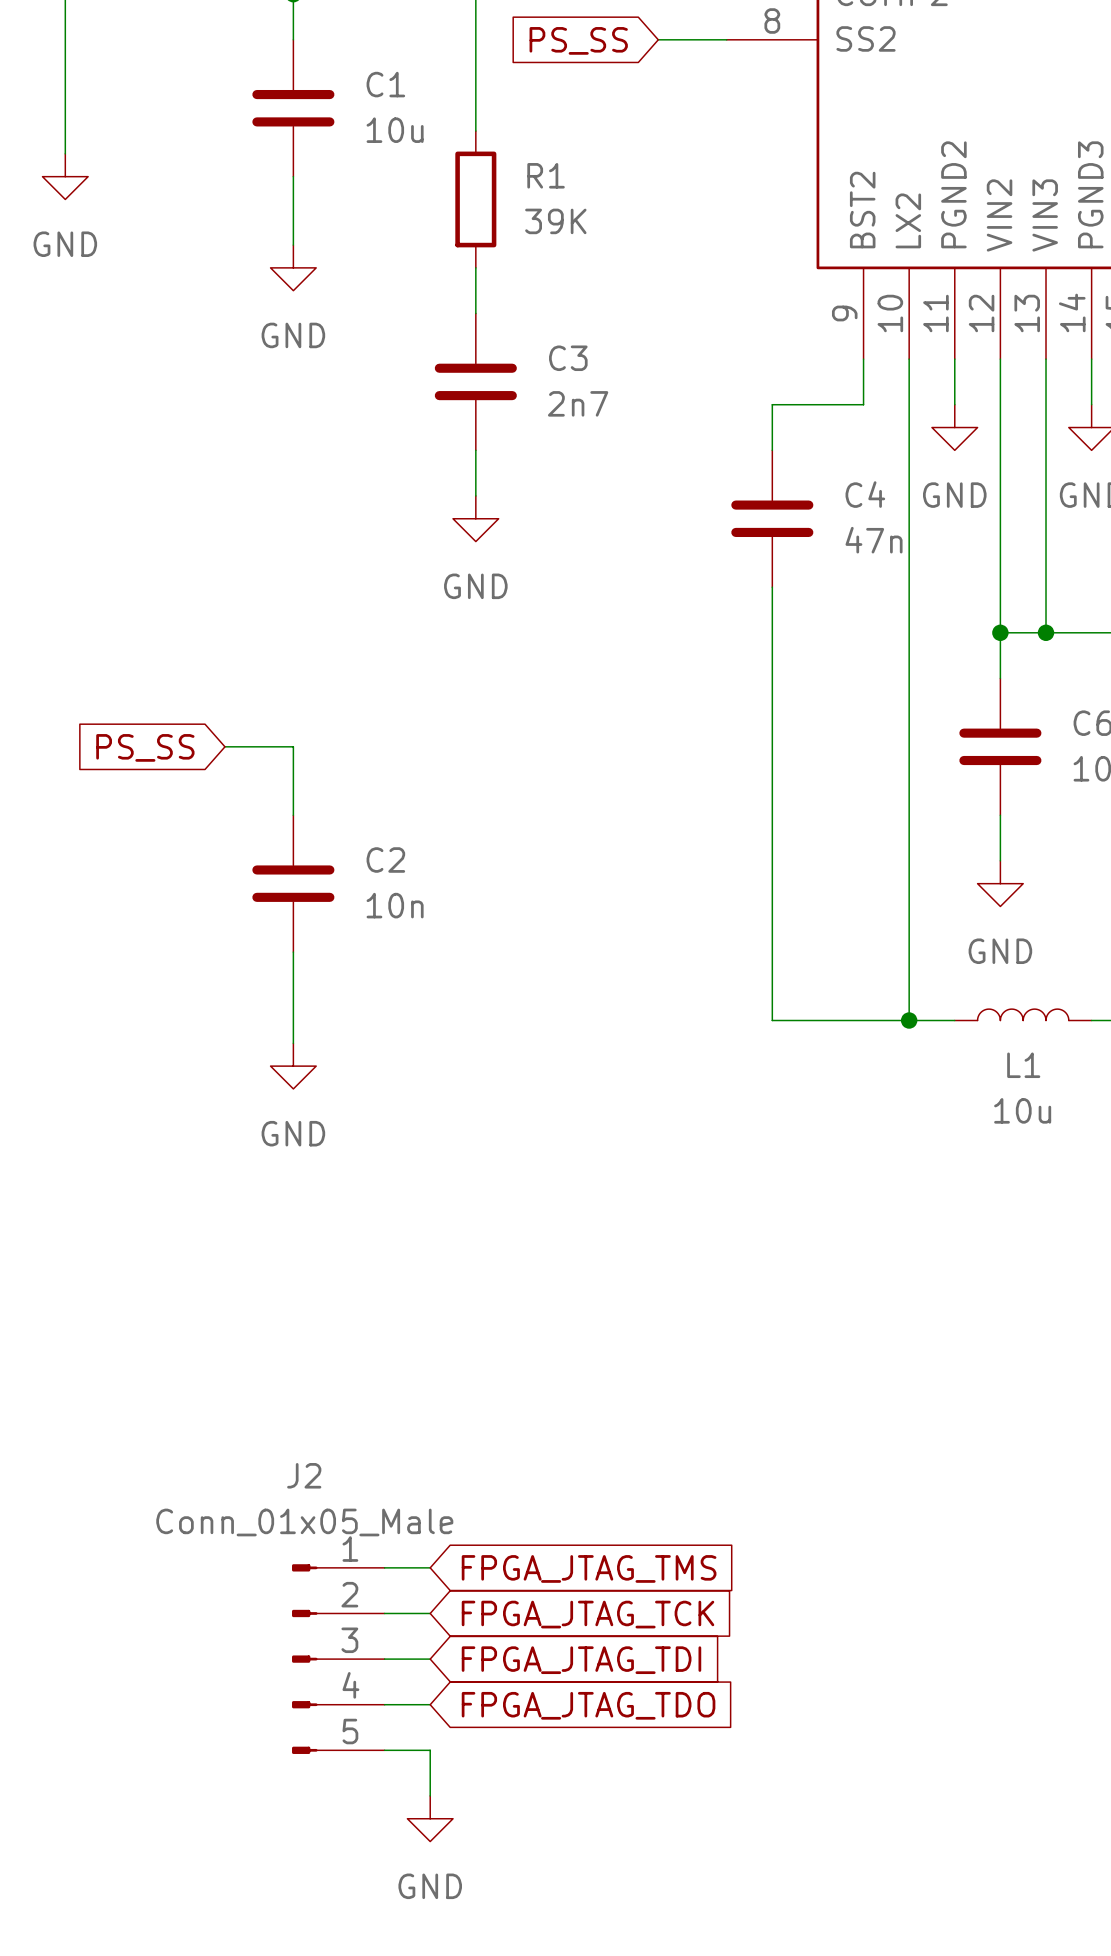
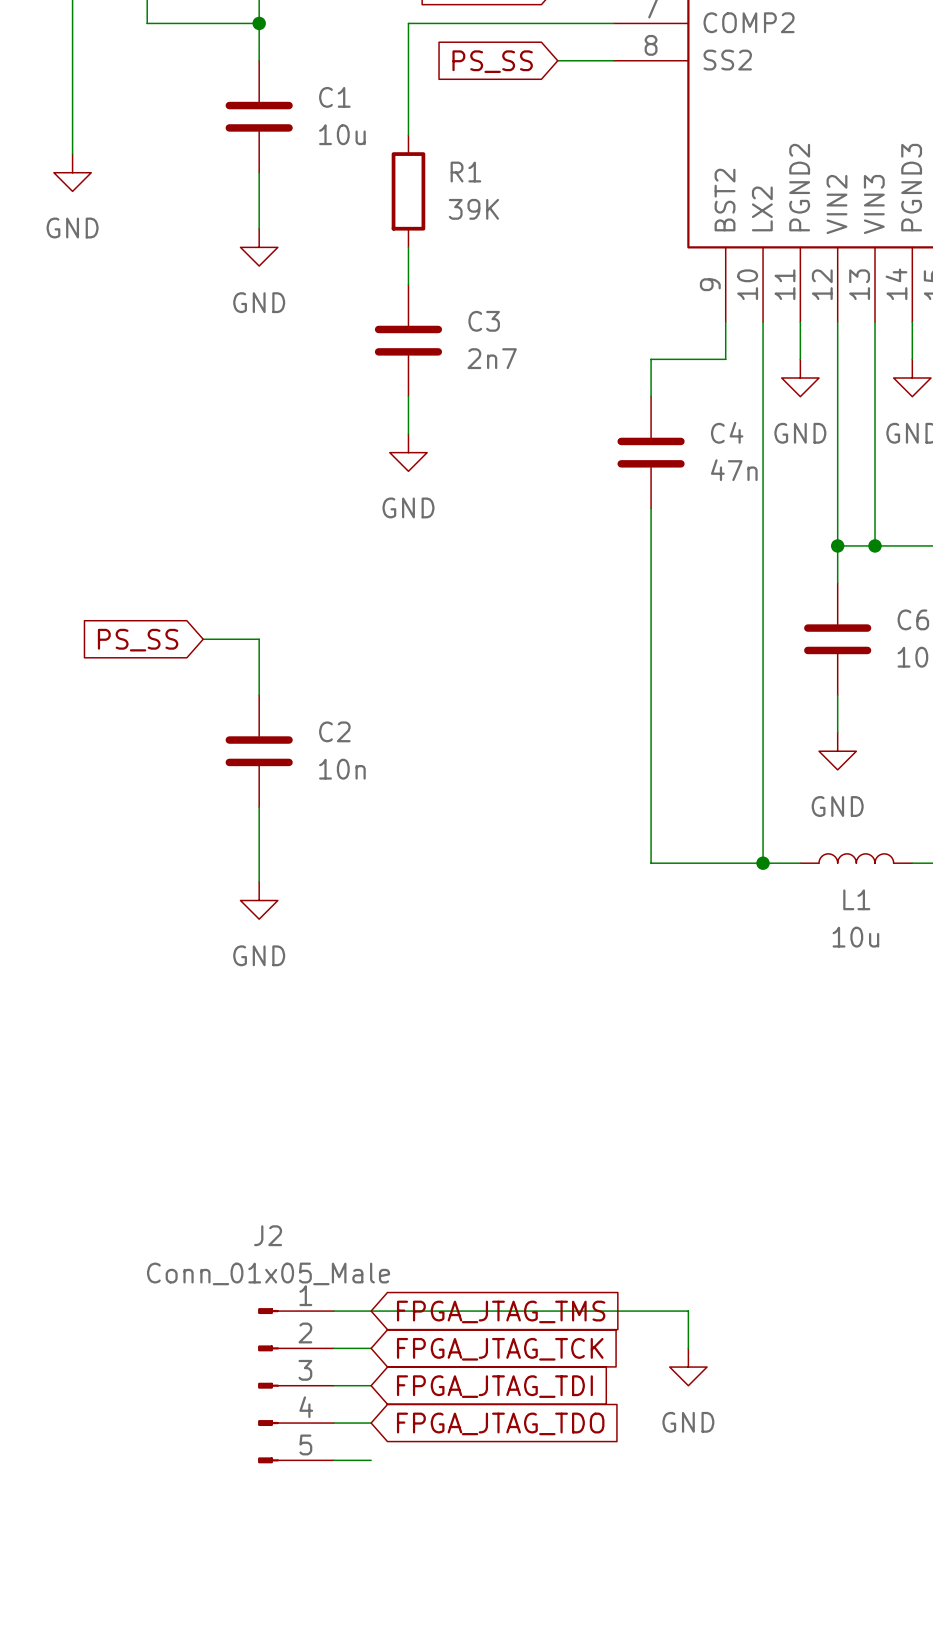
wire: none -> (371, 1311) (688, 1311) (688, 1348)
wire: (430, 1750) (430, 1795) -> none
power symbol position: GND (430, 1818) -> GND (688, 1367)

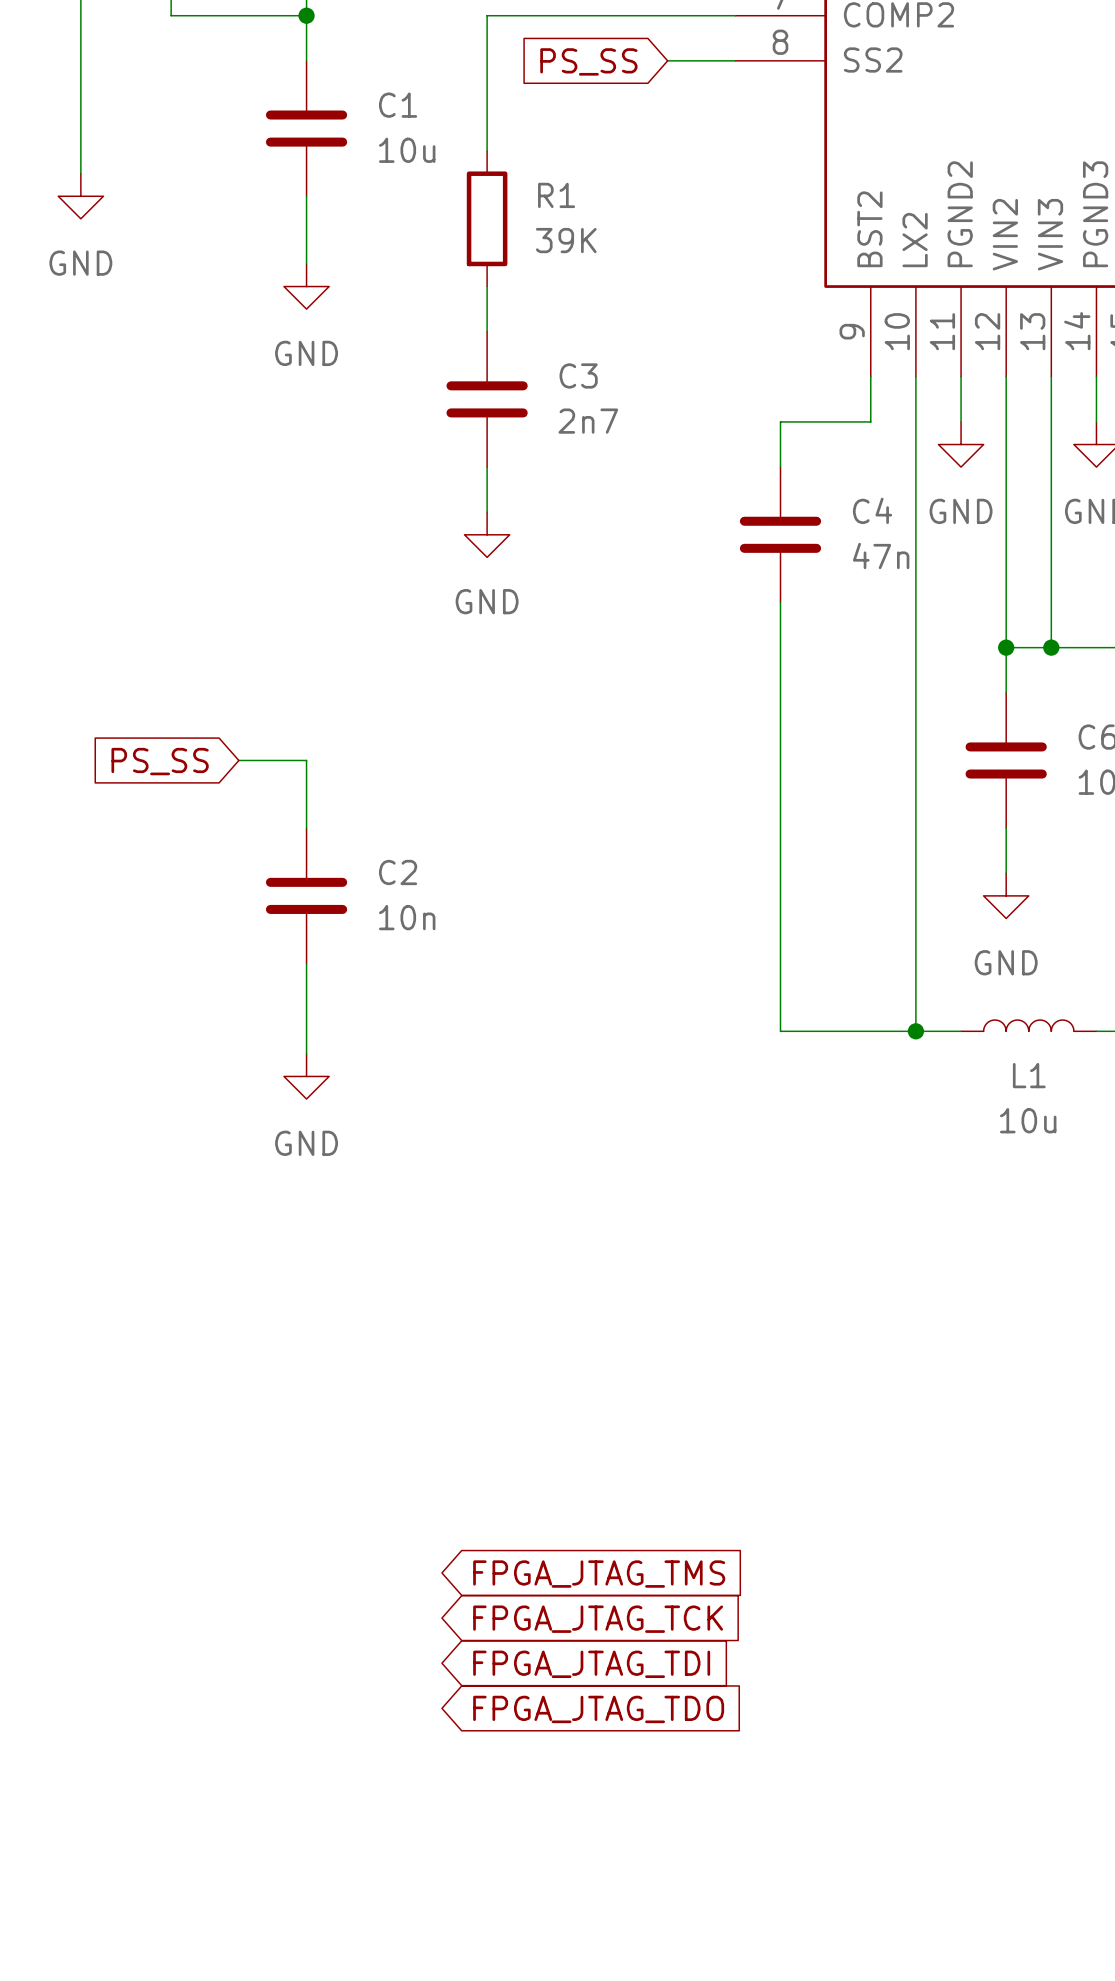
wire: (333, 1311) (688, 1311) (688, 1348) -> none
wire: (333, 1348) (371, 1348) -> none
power symbol: GND (688, 1367) -> none
J2: Conn_01x05_Male (295, 1385) -> none
wire: (333, 1385) (371, 1385) -> none
wire: (333, 1423) (371, 1423) -> none
wire: (333, 1460) (371, 1460) -> none

